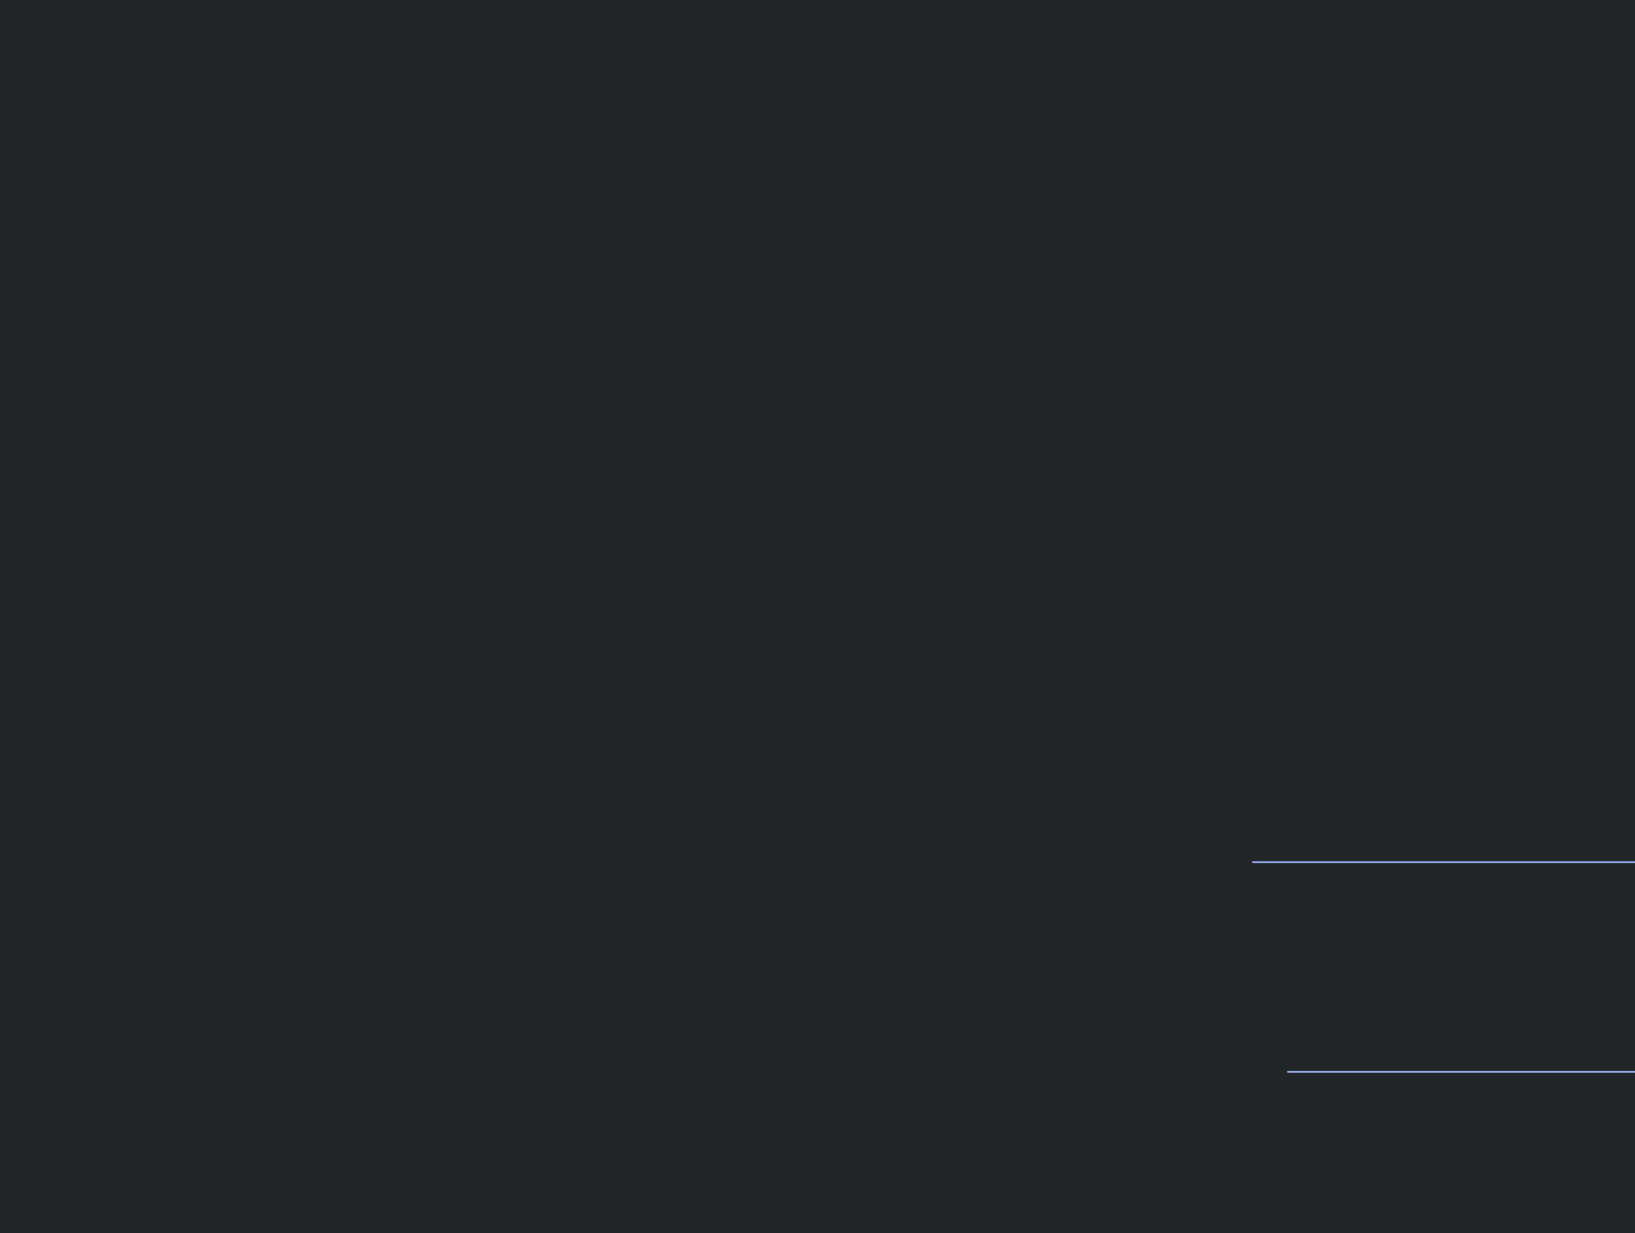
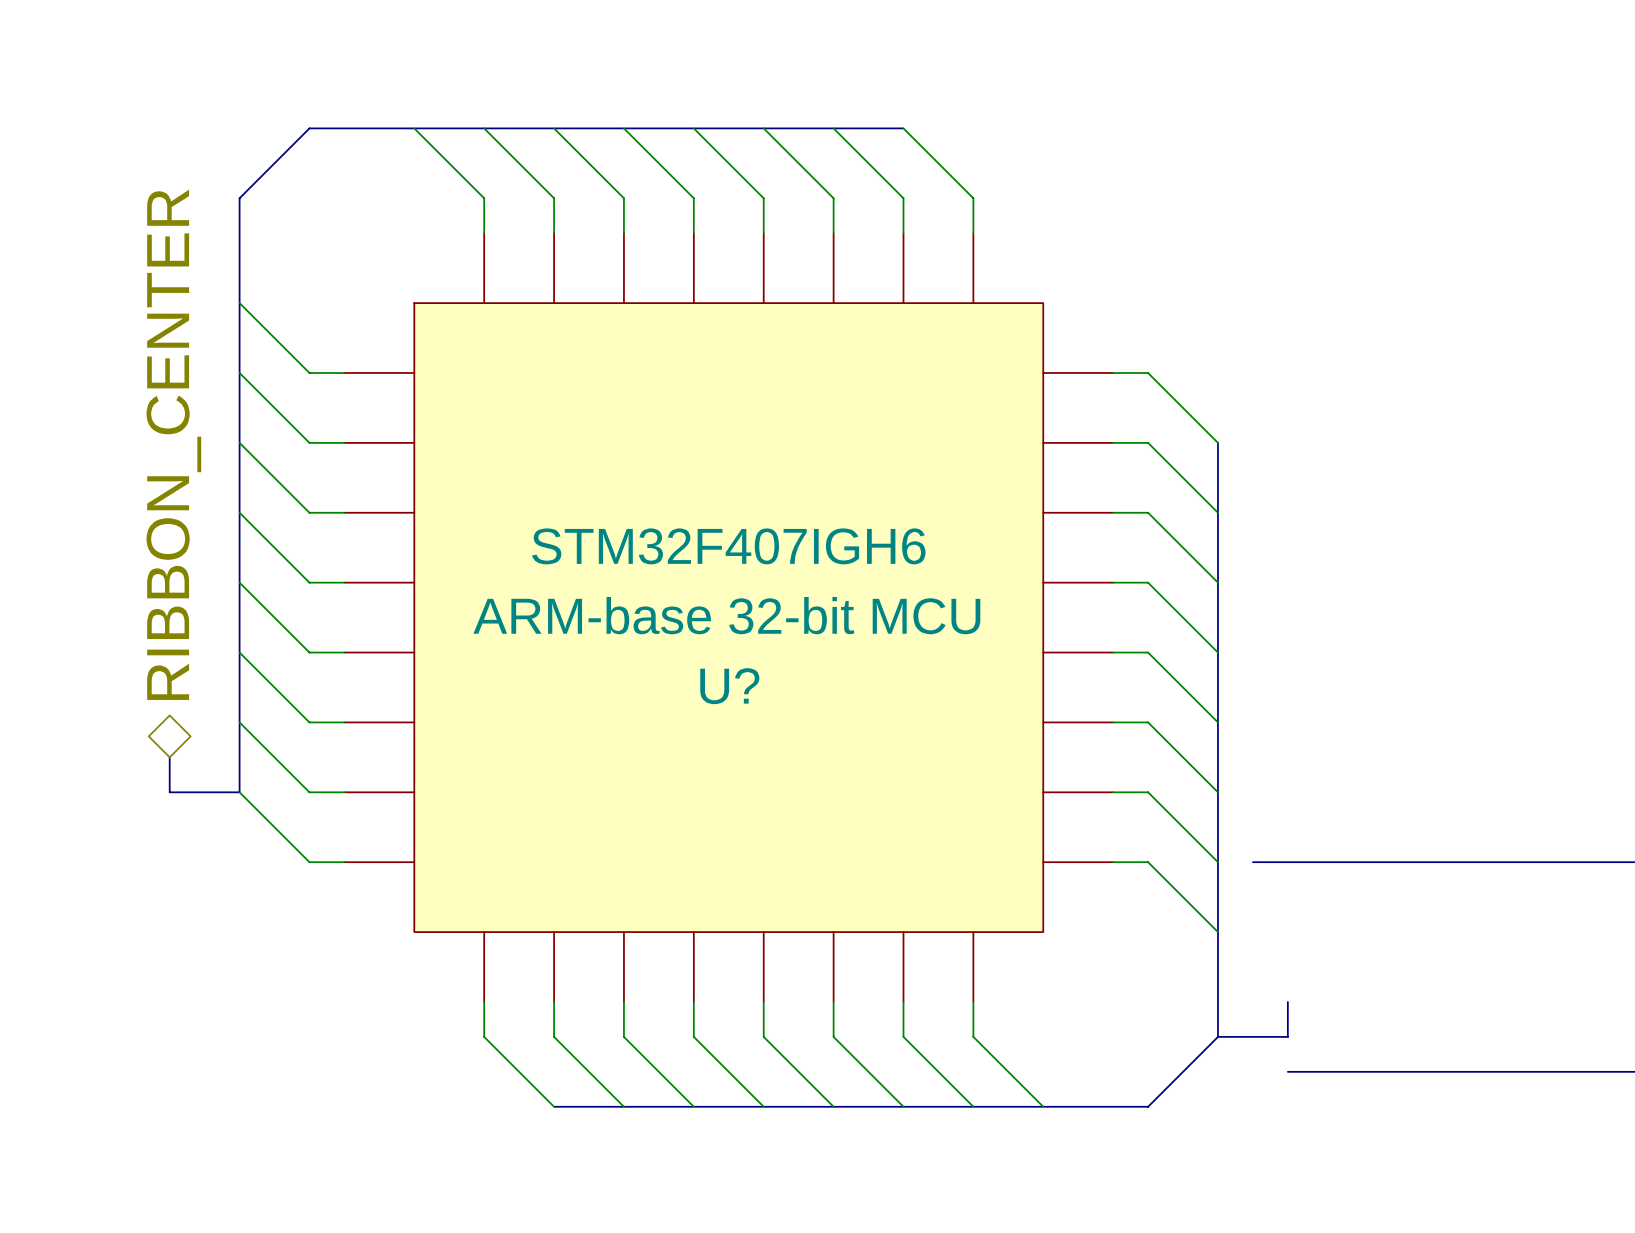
wire: none -> (414, 128) (484, 198) (484, 233)
wire: none -> (484, 128) (554, 198) (554, 233)
wire: none -> (554, 128) (623, 198) (623, 233)
wire: none -> (623, 128) (693, 198) (693, 233)
wire: none -> (693, 128) (763, 198) (763, 233)
wire: none -> (763, 128) (833, 198) (833, 233)
wire: none -> (833, 128) (903, 198) (903, 233)
bus: none -> (903, 128) (309, 128) (239, 198) (239, 792) (169, 792) (169, 757)
wire: none -> (903, 128) (973, 198) (973, 233)
wire: none -> (239, 303) (309, 372) (344, 372)
wire: none -> (239, 372) (309, 442) (344, 442)
wire: none -> (1113, 372) (1148, 372) (1217, 442)
wire: none -> (239, 442) (309, 512) (344, 512)
wire: none -> (1113, 442) (1148, 442) (1217, 512)
bus: none -> (1217, 442) (1217, 1036)
hierarchical label: none -> RIBBON_CENTER (173, 444)
wire: none -> (239, 512) (309, 582) (344, 582)
wire: none -> (1113, 512) (1148, 512) (1217, 582)
wire: none -> (239, 582) (309, 652) (344, 652)
wire: none -> (1113, 582) (1148, 582) (1217, 652)
U?: none -> STM32F407IGH6 (728, 617)
wire: none -> (239, 652) (309, 722) (344, 722)
wire: none -> (1113, 652) (1148, 652) (1217, 722)
wire: none -> (239, 722) (309, 792) (344, 792)
wire: none -> (1113, 722) (1148, 722) (1217, 792)
wire: none -> (239, 792) (309, 862) (344, 862)
wire: none -> (1113, 792) (1148, 792) (1217, 862)
wire: none -> (1113, 862) (1148, 862) (1217, 932)
wire: none -> (484, 1001) (484, 1036) (554, 1106)
wire: none -> (554, 1001) (554, 1036) (623, 1106)
wire: none -> (623, 1001) (623, 1036) (693, 1106)
wire: none -> (693, 1001) (693, 1036) (763, 1106)
wire: none -> (763, 1001) (763, 1036) (833, 1106)
wire: none -> (833, 1001) (833, 1036) (903, 1106)
wire: none -> (903, 1001) (903, 1036) (973, 1106)
wire: none -> (973, 1001) (973, 1036) (1043, 1106)
bus: none -> (1287, 1001) (1287, 1036) (1217, 1036)
bus: none -> (1217, 1036) (1148, 1106) (554, 1106)

